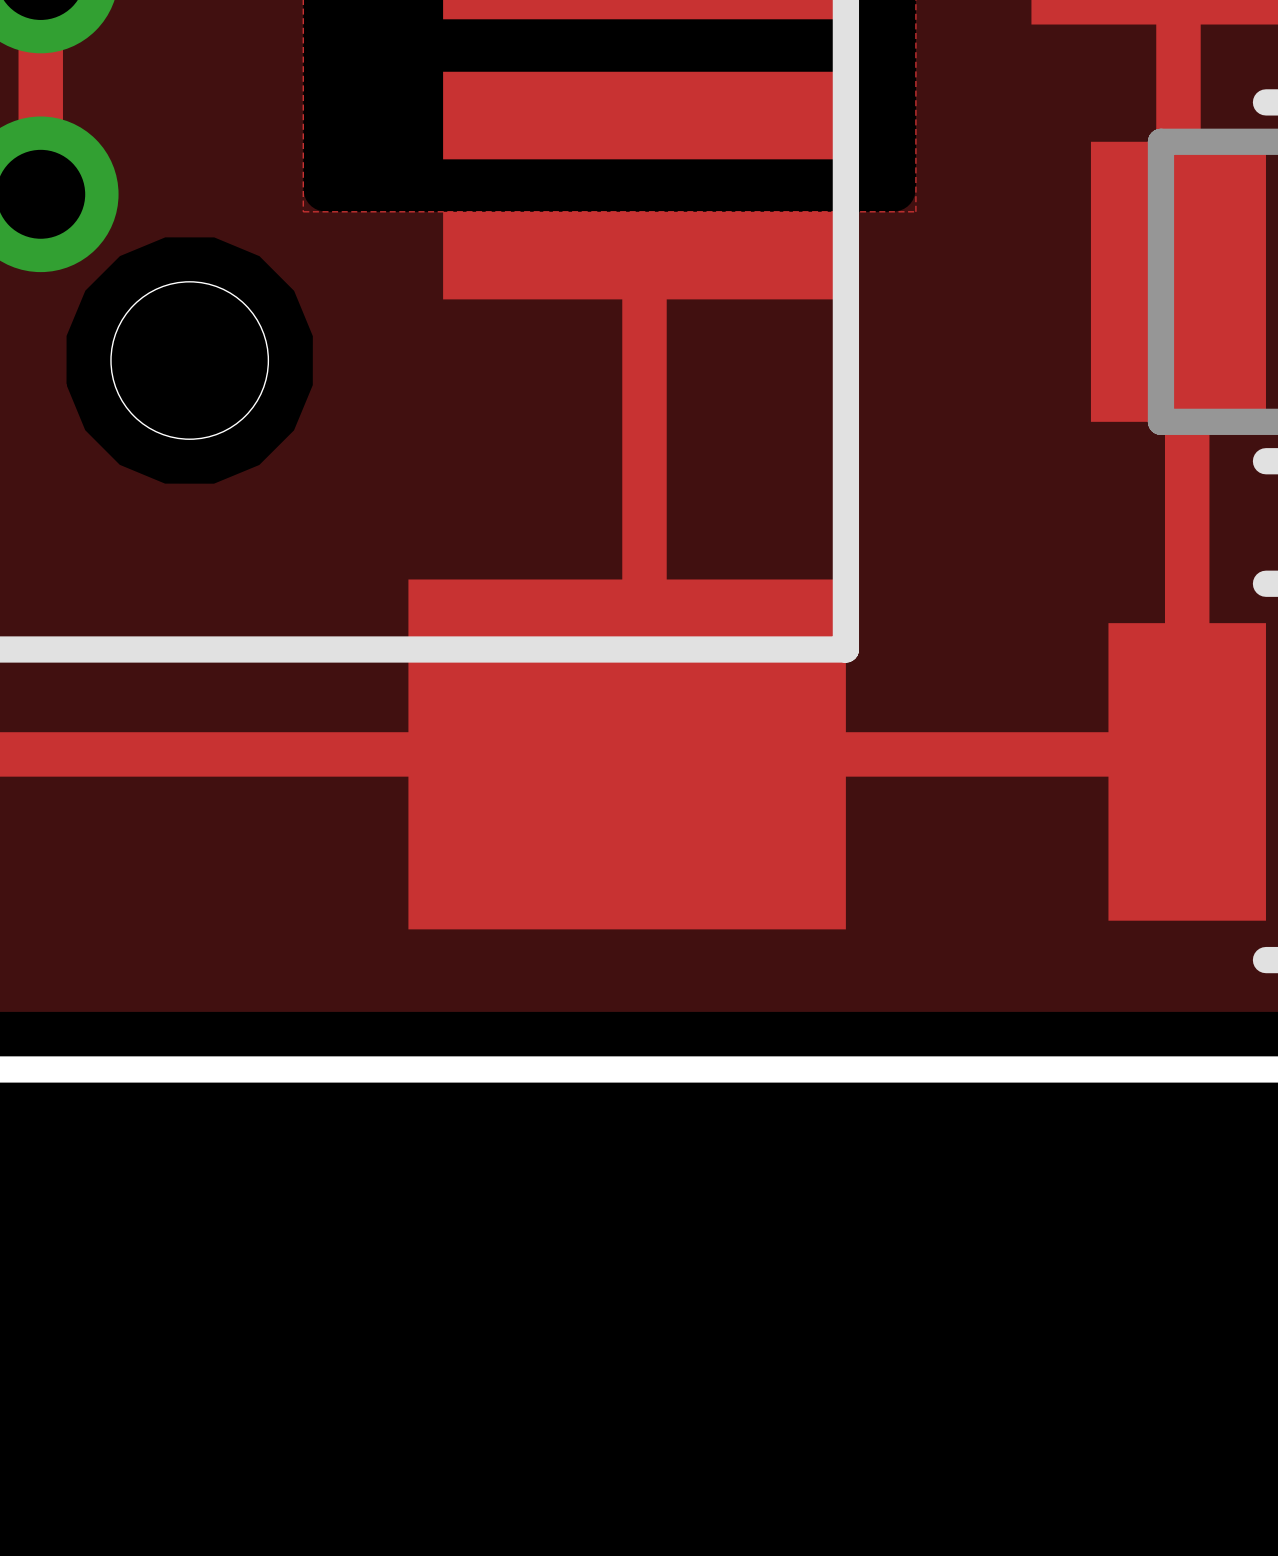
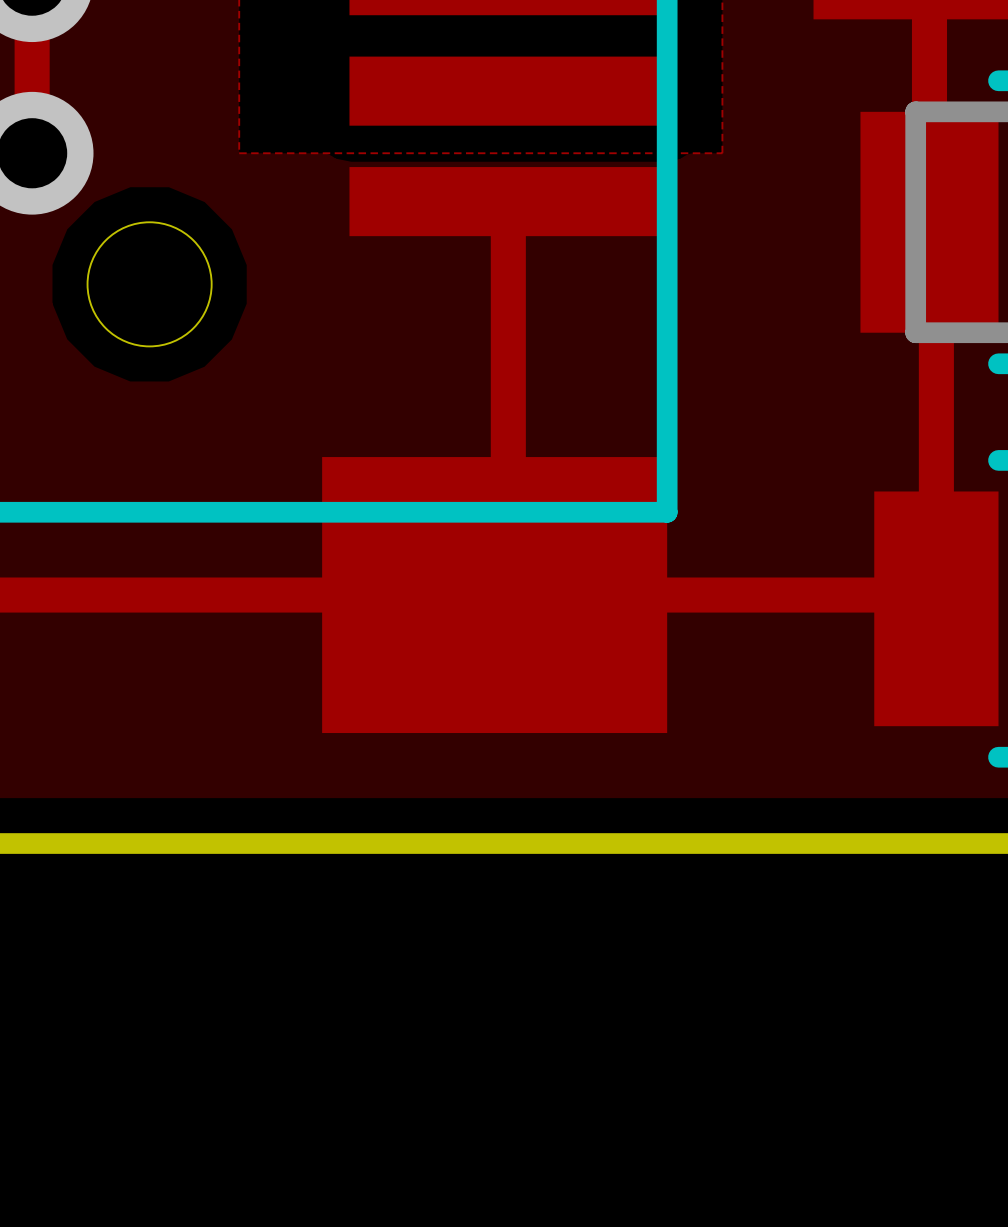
zone outline: (303, 194) (303, 211) (915, 211) (915, 194) -> (239, 153) (722, 153)

